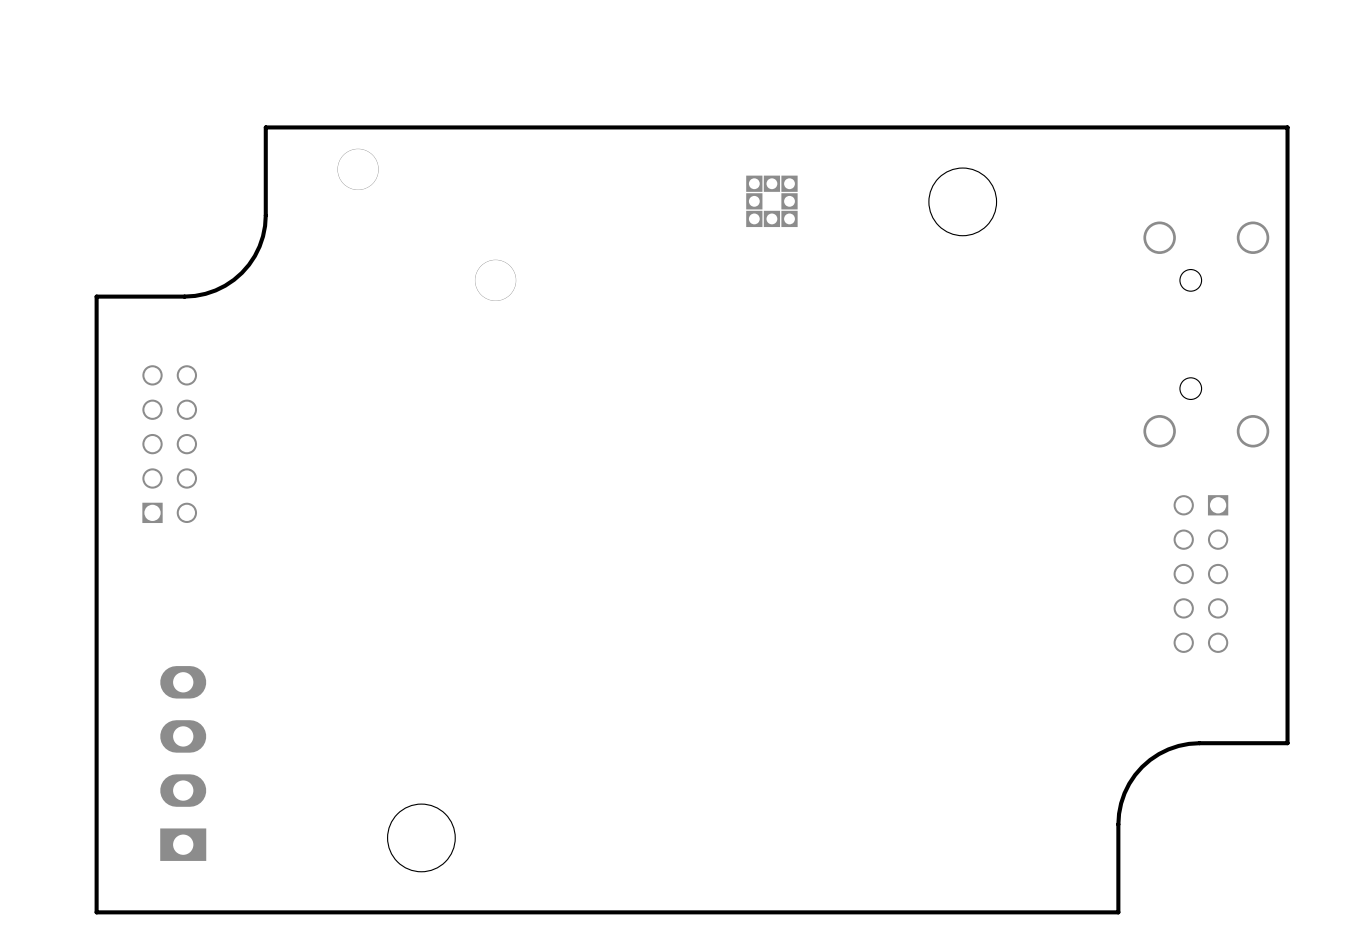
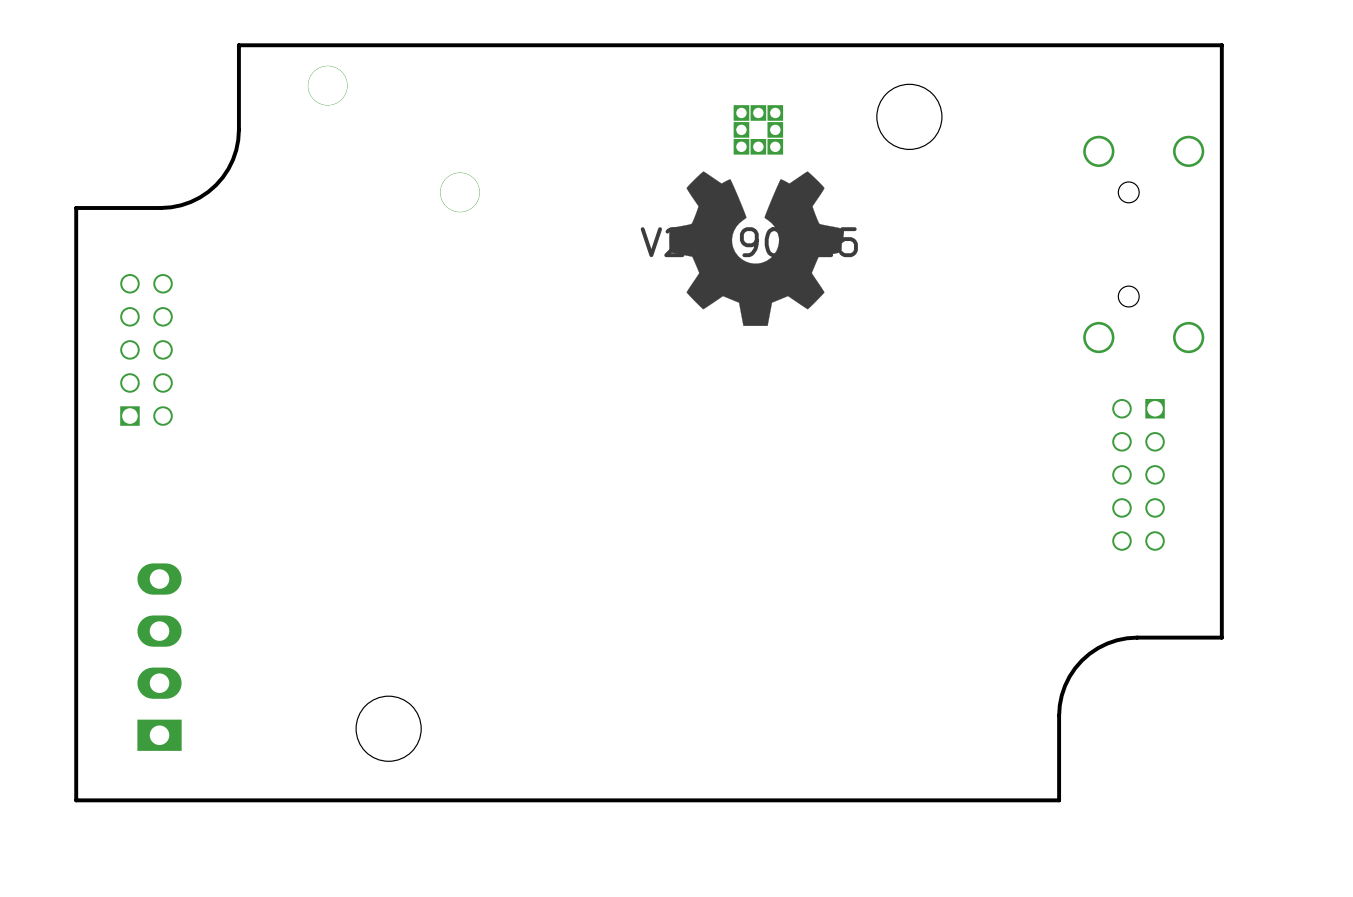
part position: (771, 201) -> (758, 129)
drawing: none -> [669, 171, 842, 326]

